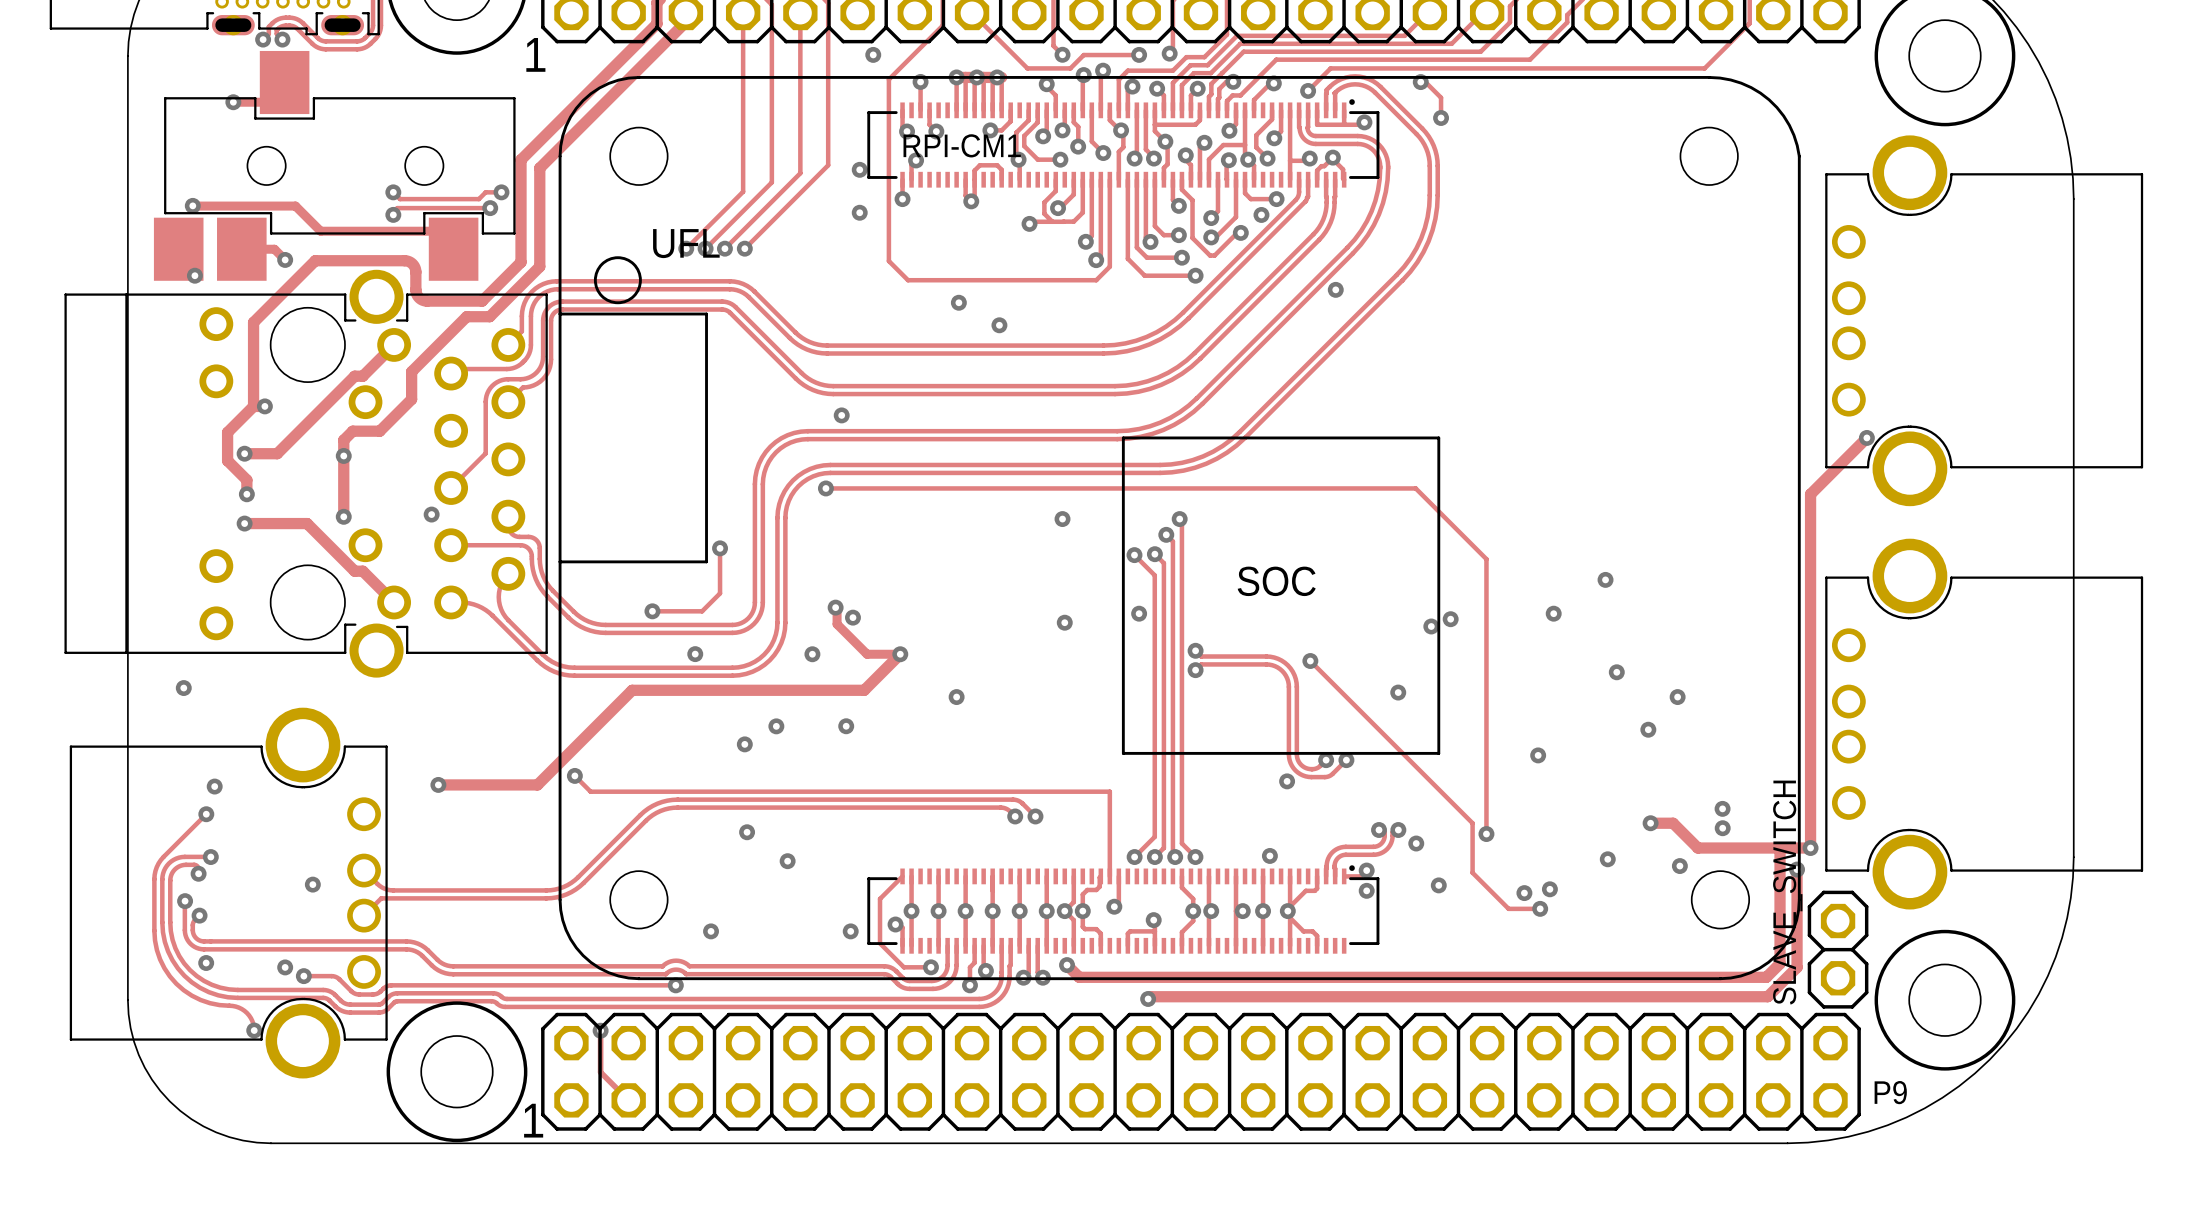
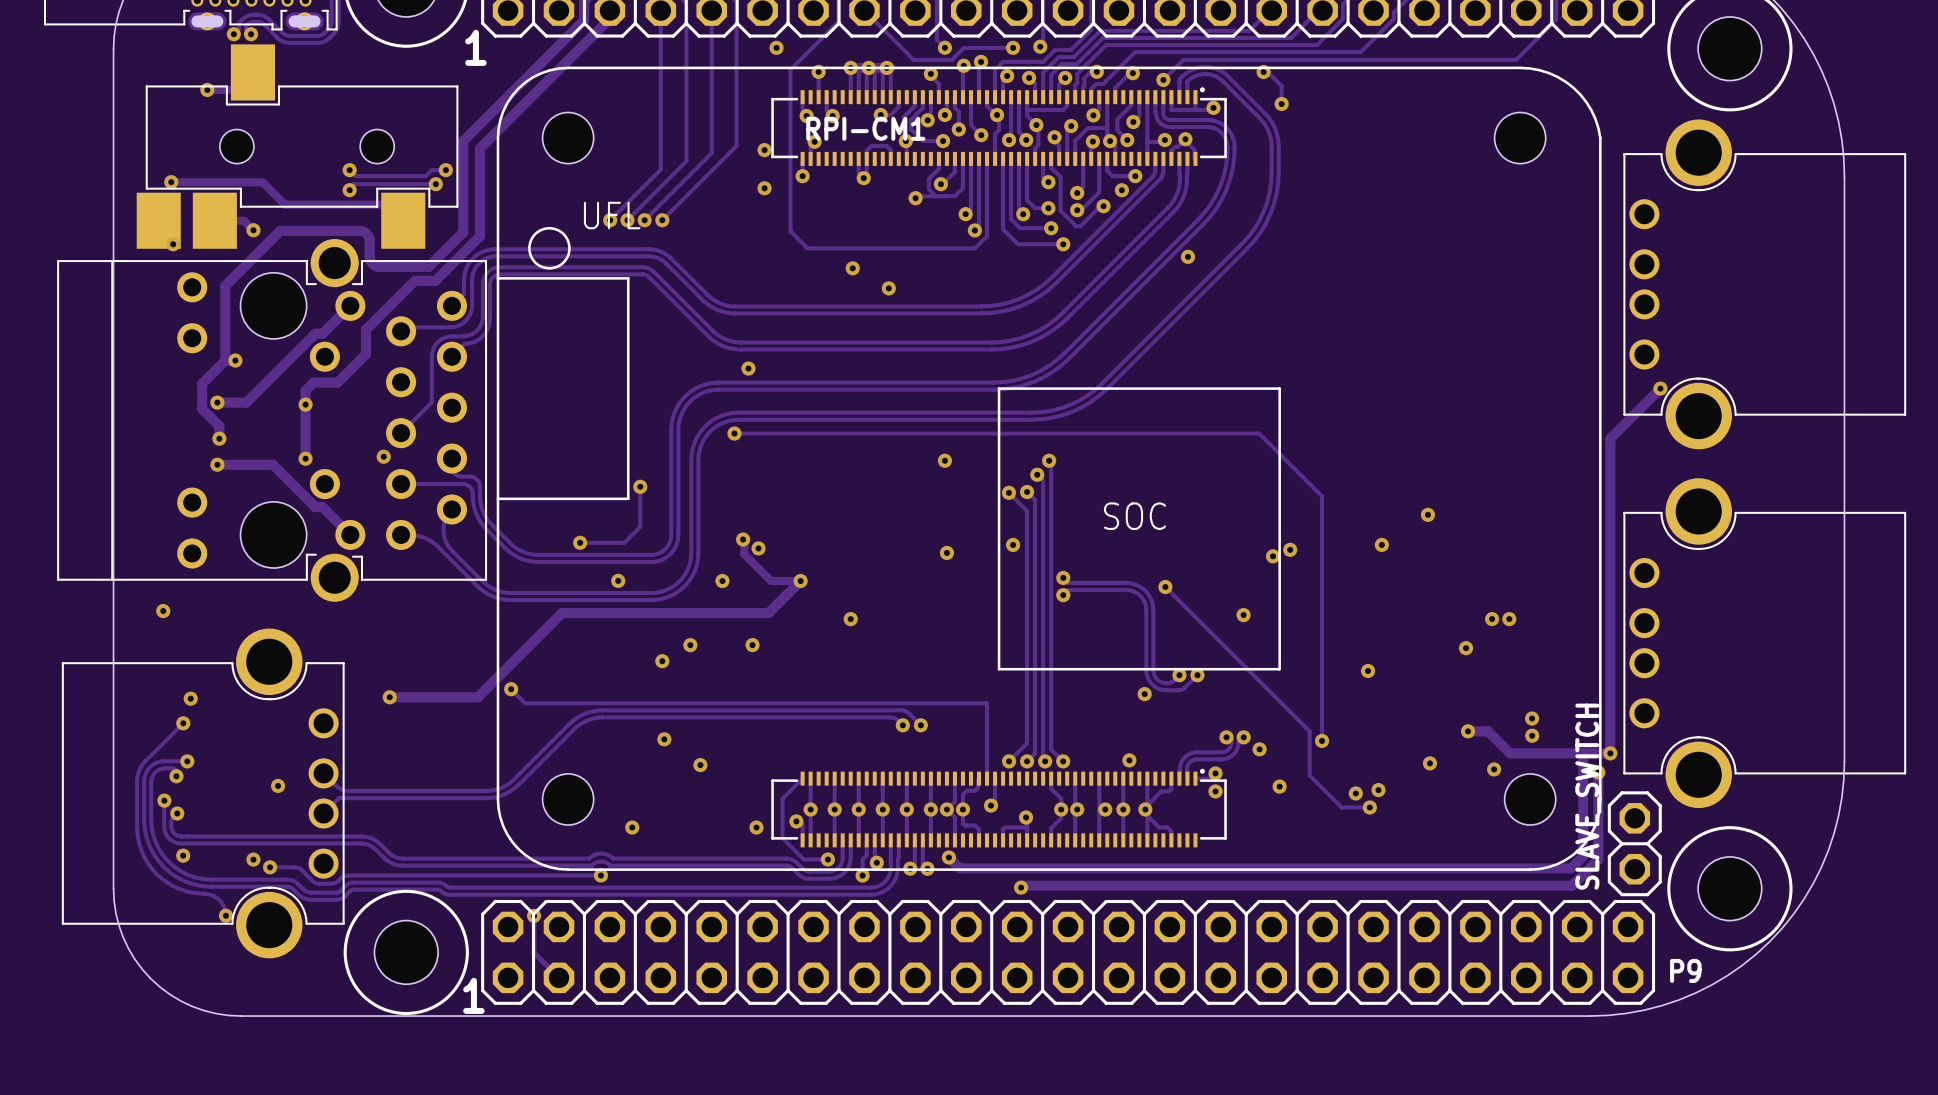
via position: (1616, 672) -> (1509, 619)

